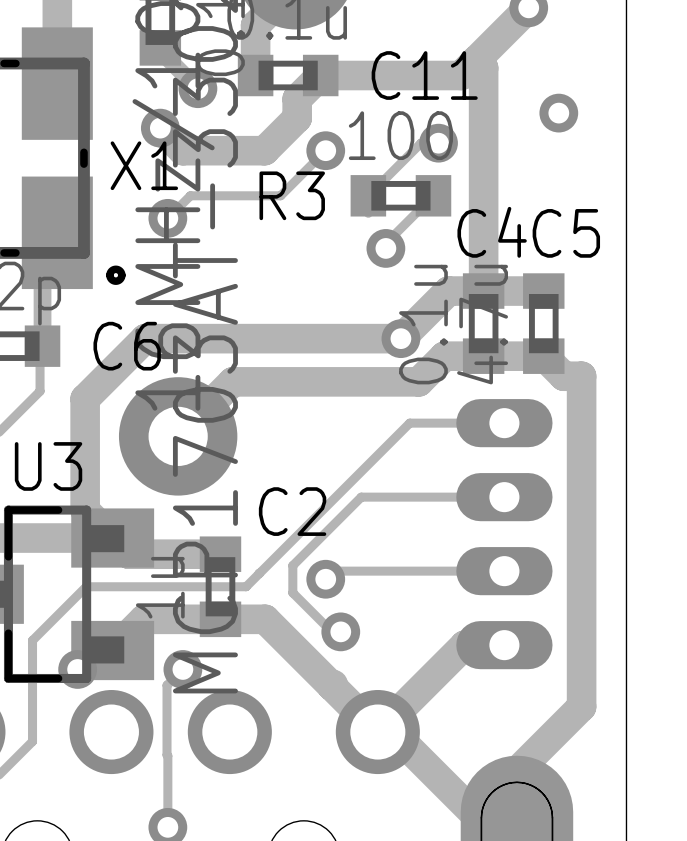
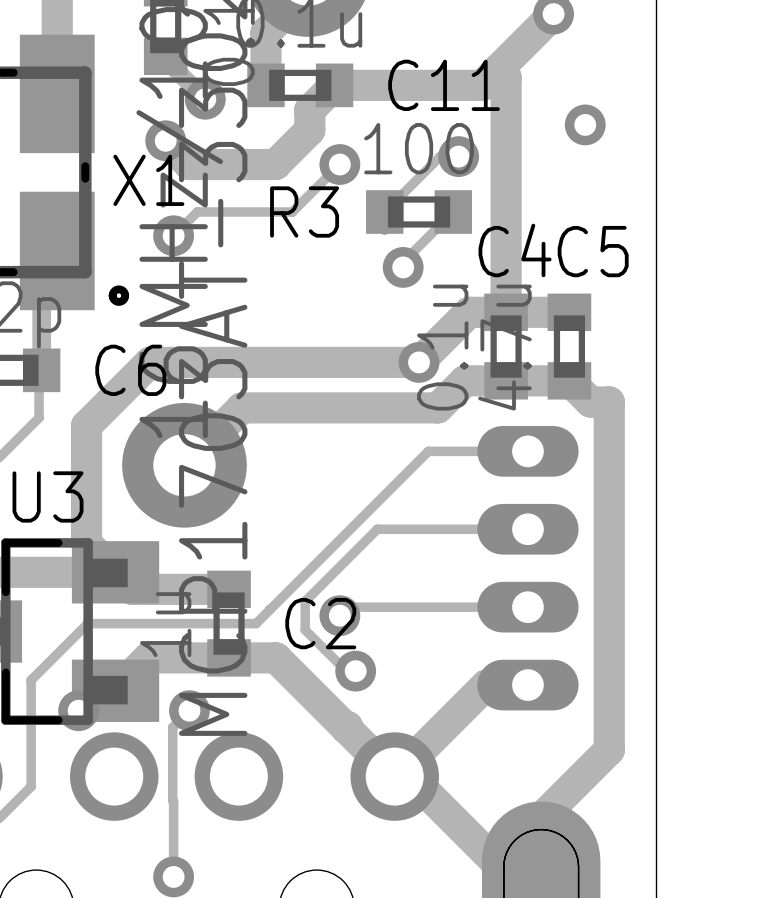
C2 name position: C2 (292, 511) -> C2 (320, 623)

